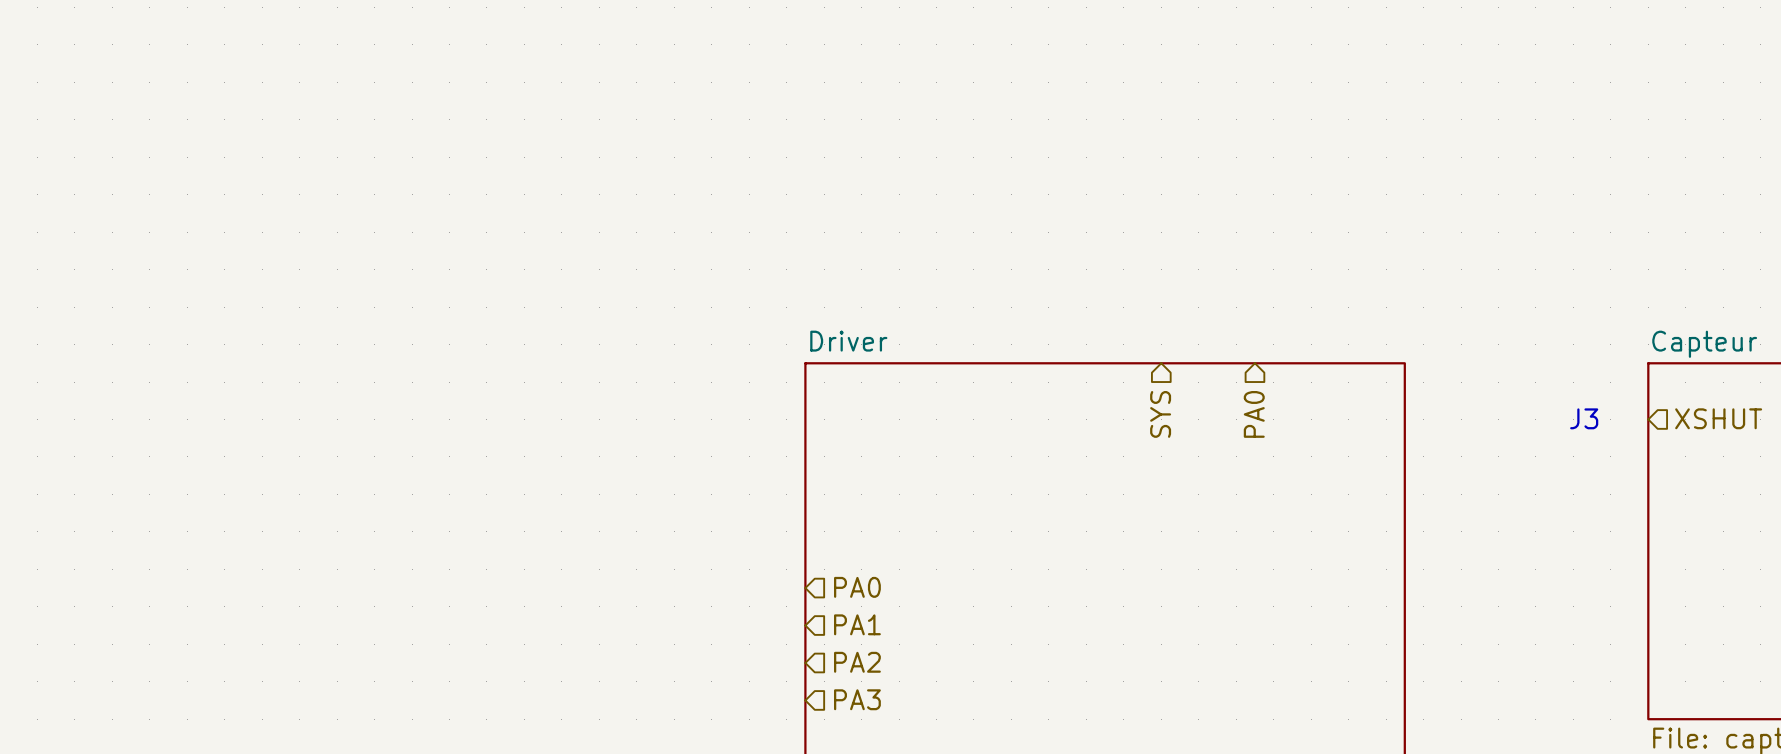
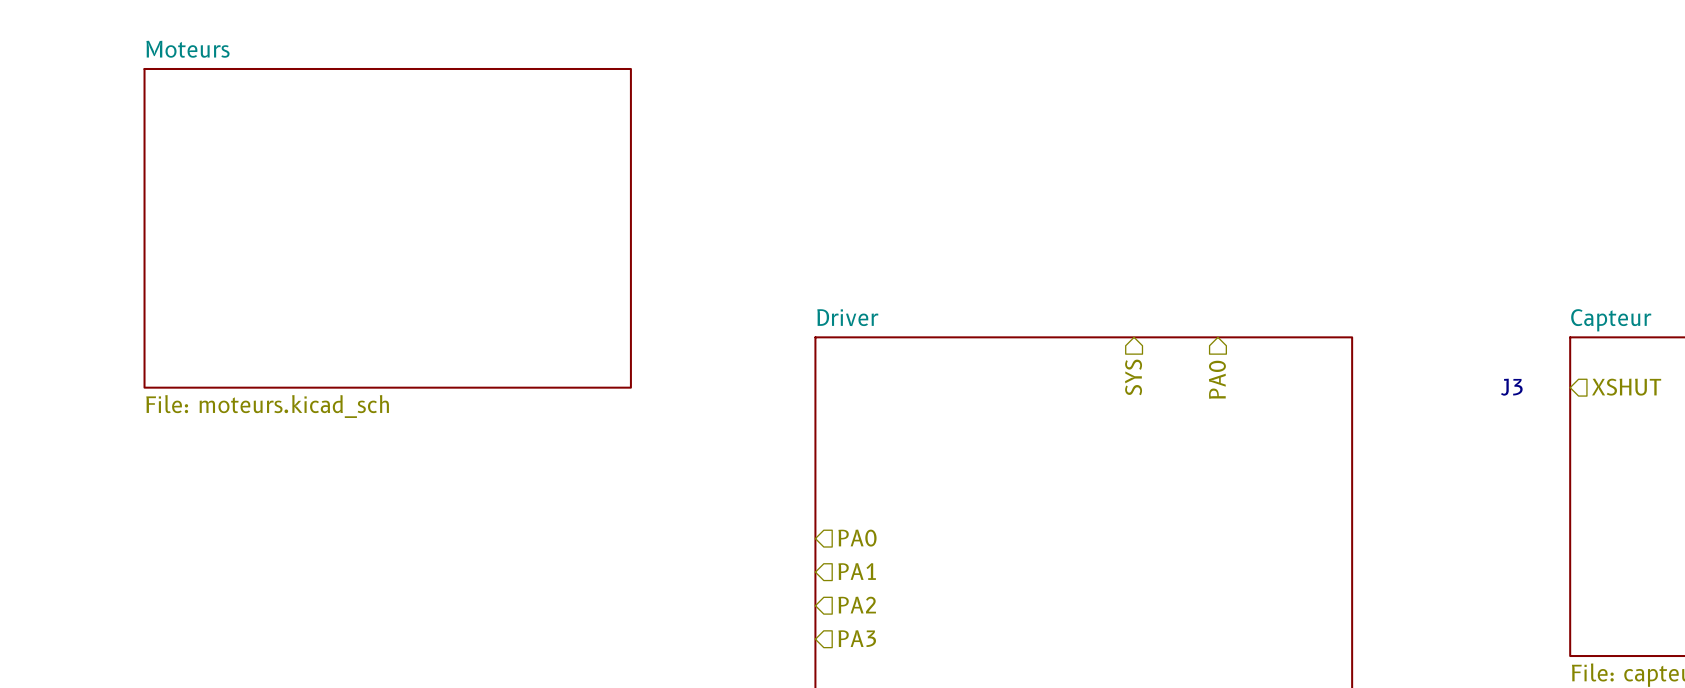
sheet Moteurs: none -> File: moteurs.kicad_sch (387, 228)

